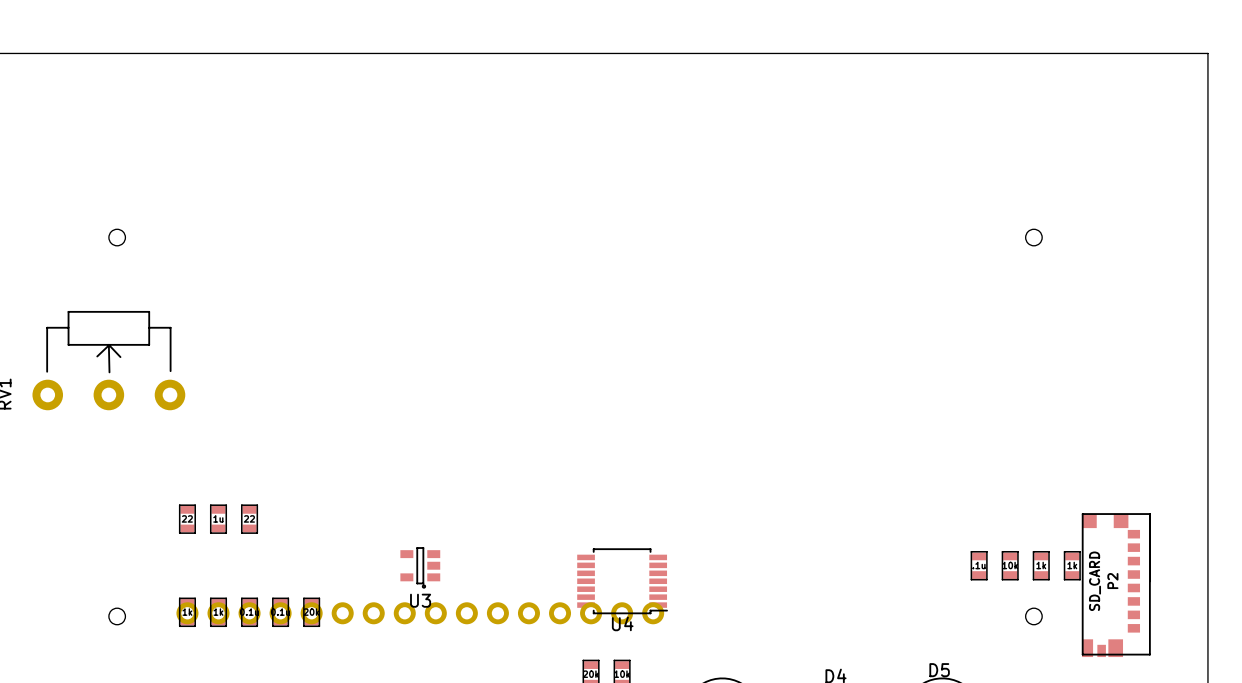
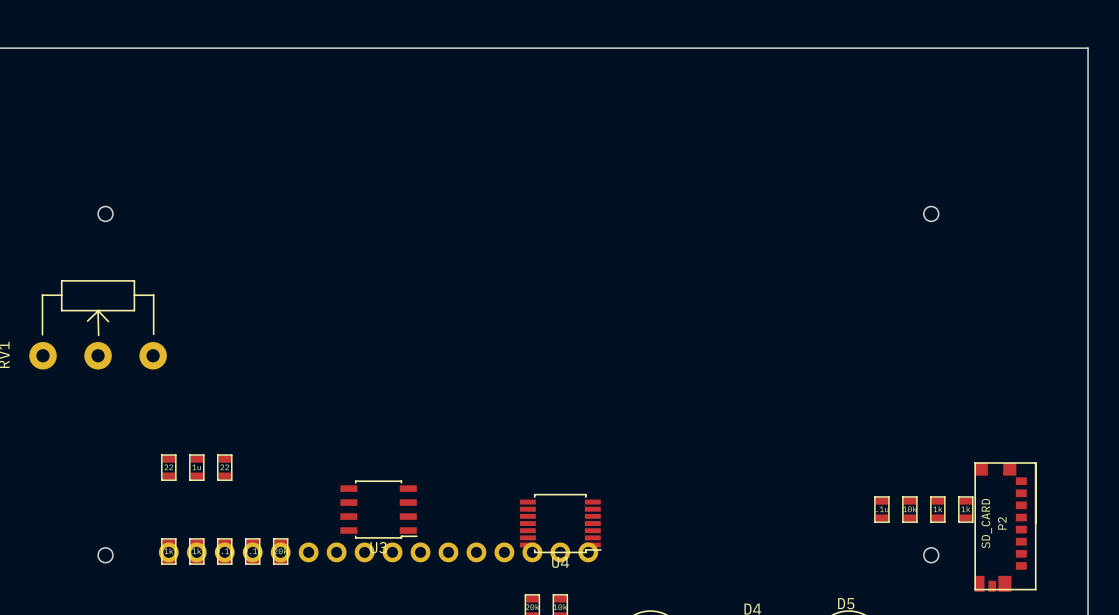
U3 footprint: [400, 547, 441, 589] -> [340, 480, 418, 539]

